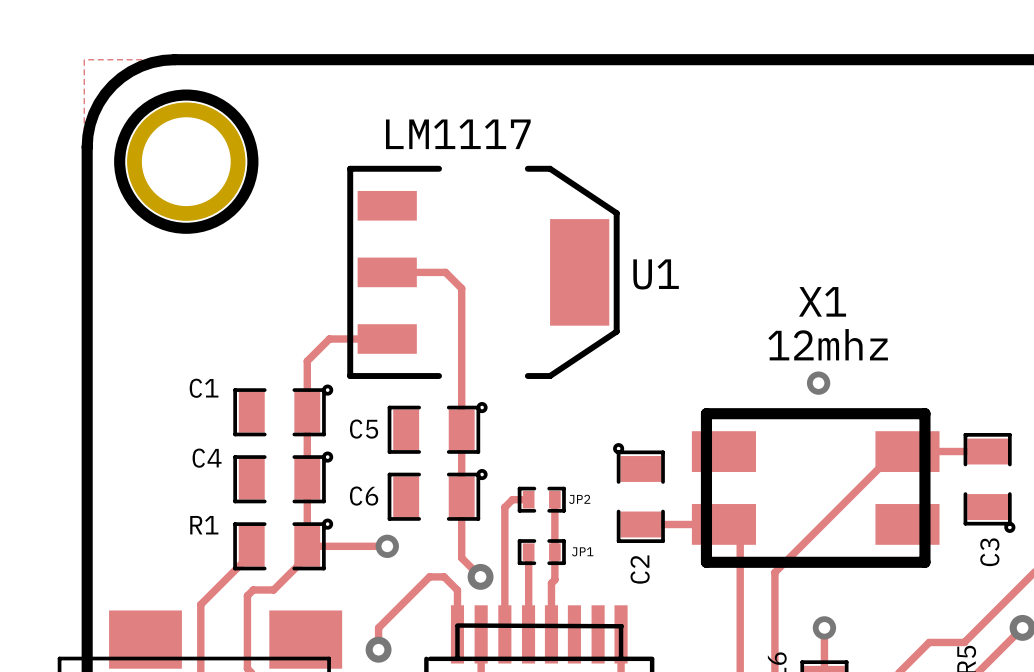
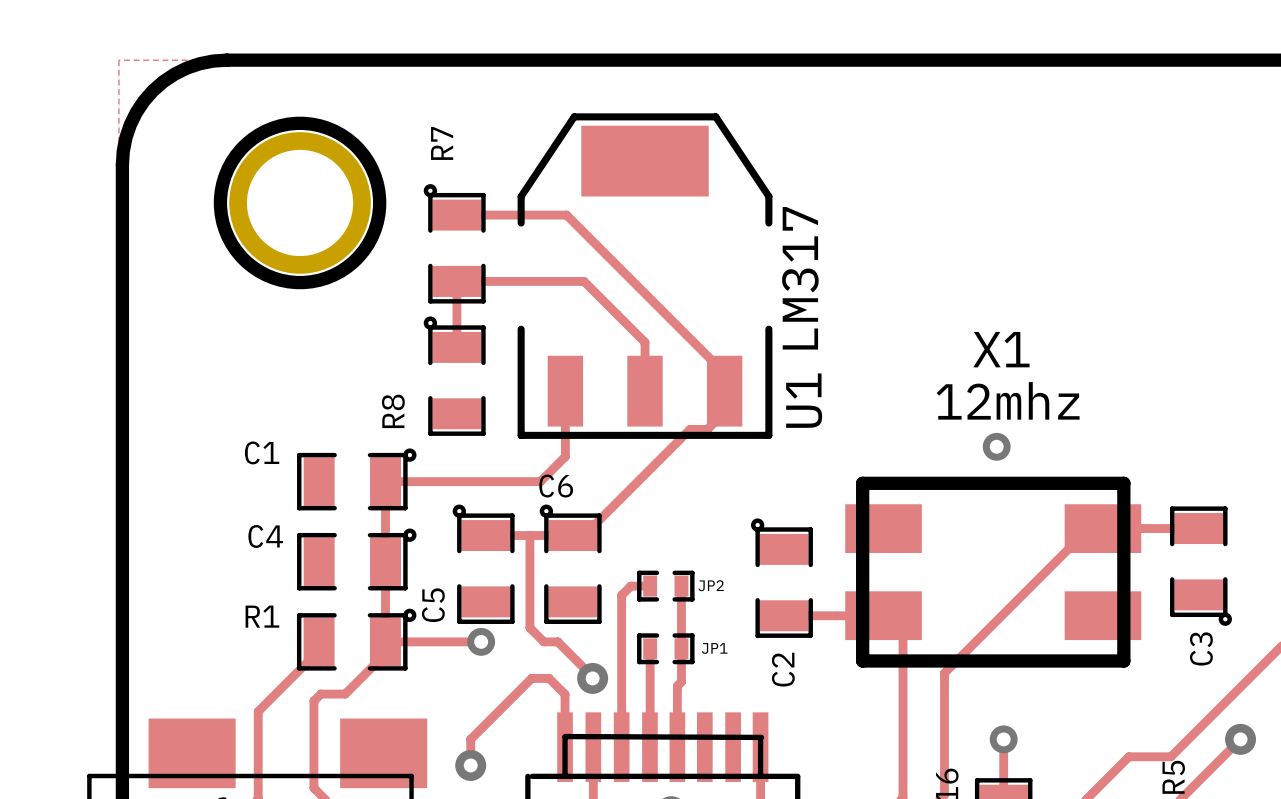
U1 value: LM1117 (458, 134) -> LM317 (800, 278)
part position: (186, 161) -> (300, 202)
track: none -> (456, 215) (566, 215) (724, 373) (724, 412) (707, 429) (690, 429) (583, 535) (485, 535)
R7: none -> (454, 243)
track: (387, 272) (445, 272) (461, 288) (461, 558) (480, 576) -> none
U1 rotation: 0° (483, 272) -> 90° counterclockwise (645, 276)
U1 name position: U1 (656, 274) -> U1 (804, 400)
track: none -> (456, 347) (456, 281) (584, 281) (645, 342) (645, 391)
R8: none -> (454, 376)
track: (387, 339) (329, 339) (307, 361) (307, 412) -> (573, 399) (565, 391) (565, 456) (540, 481) (385, 481)
C5 rotation: 0° (437, 427) -> 90° counterclockwise (483, 564)
C5 position: (437, 427) -> (483, 564)
track: none -> (529, 535) (529, 627) (543, 641) (557, 641) (592, 676)
C6 rotation: 0° (437, 494) -> 90° counterclockwise (570, 564)
C6 name position: C6 (364, 496) -> C6 (556, 486)

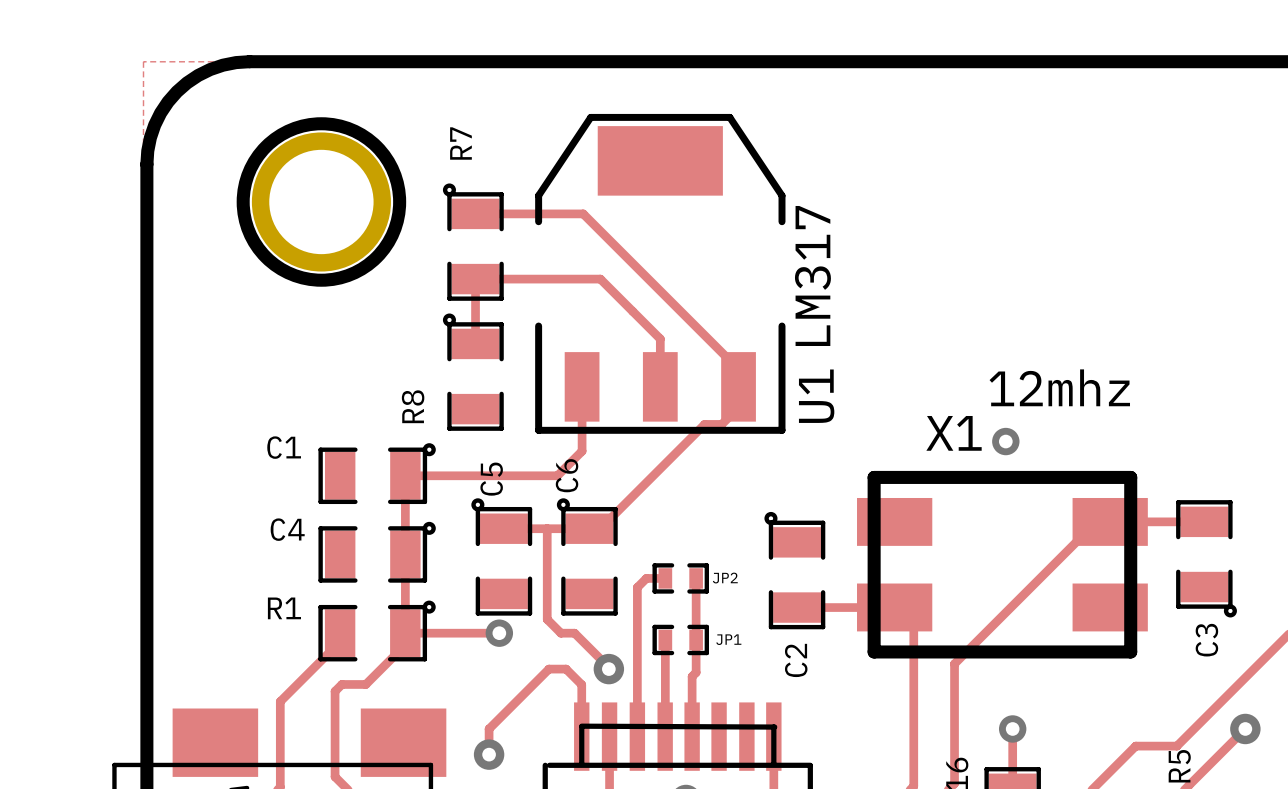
X1 name position: X1 (1001, 349) -> X1 (954, 433)
X1 value position: 12mhz (1008, 400) -> 12mhz (1059, 387)
C6 name rotation: 0° (556, 486) -> 90° counterclockwise (567, 475)
C5 name position: C5 (433, 605) -> C5 (491, 479)

